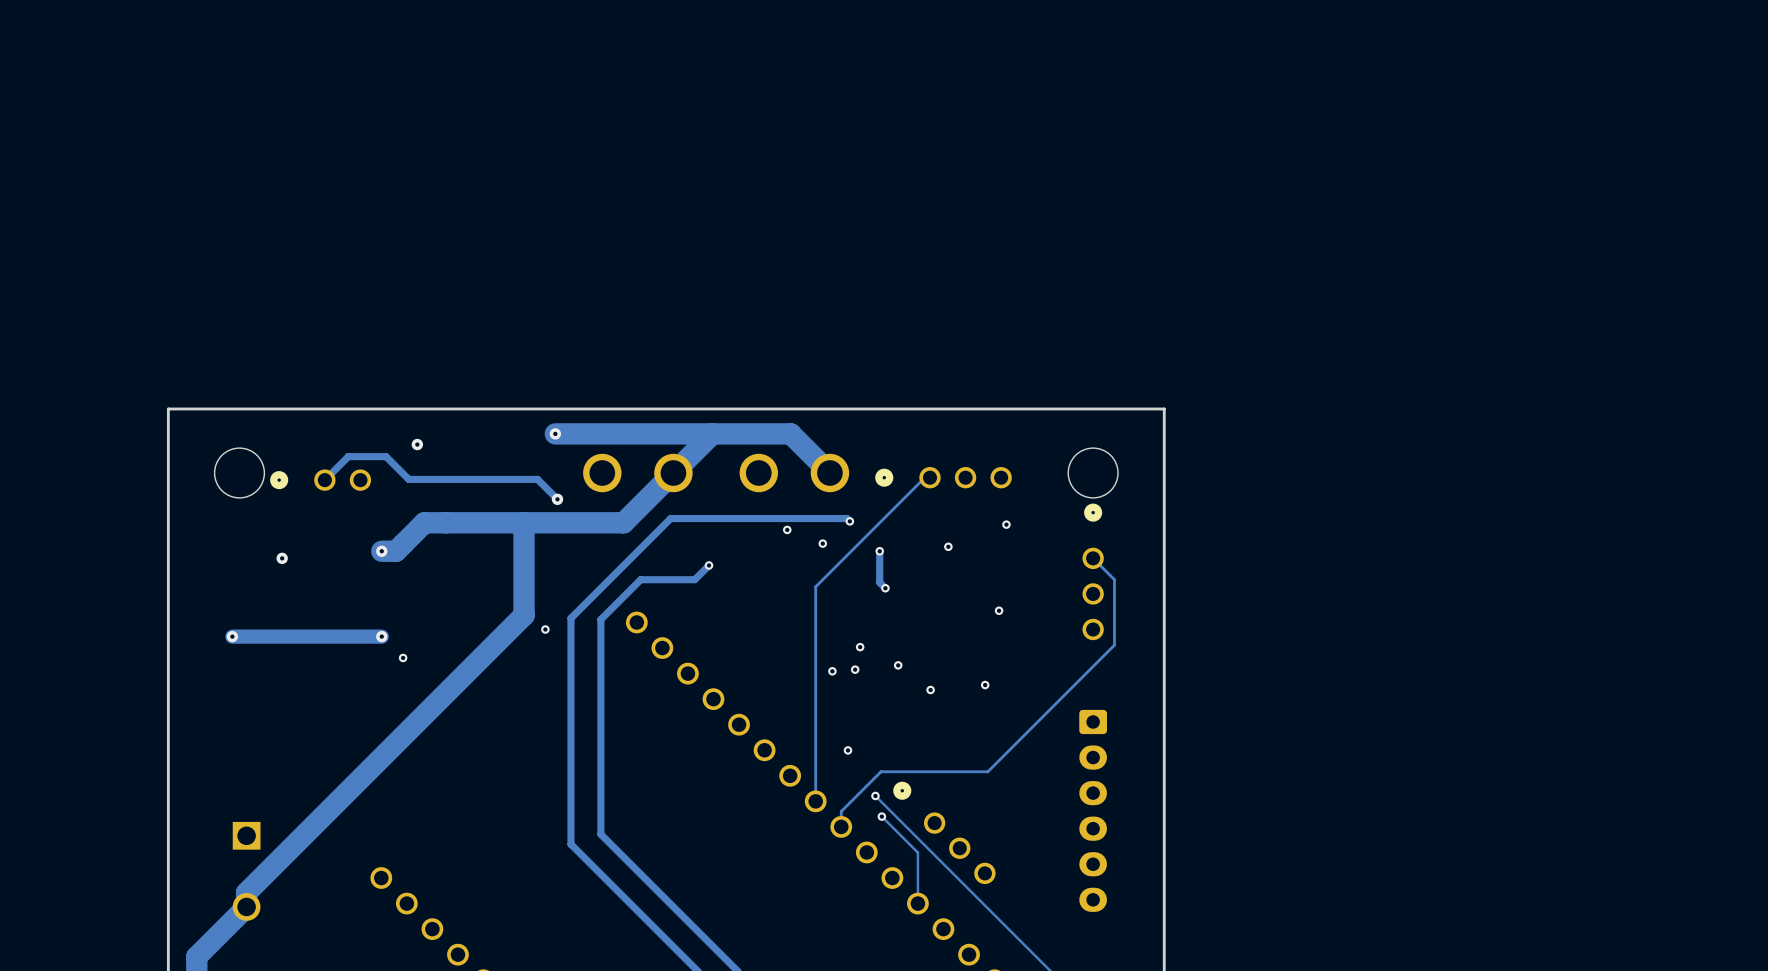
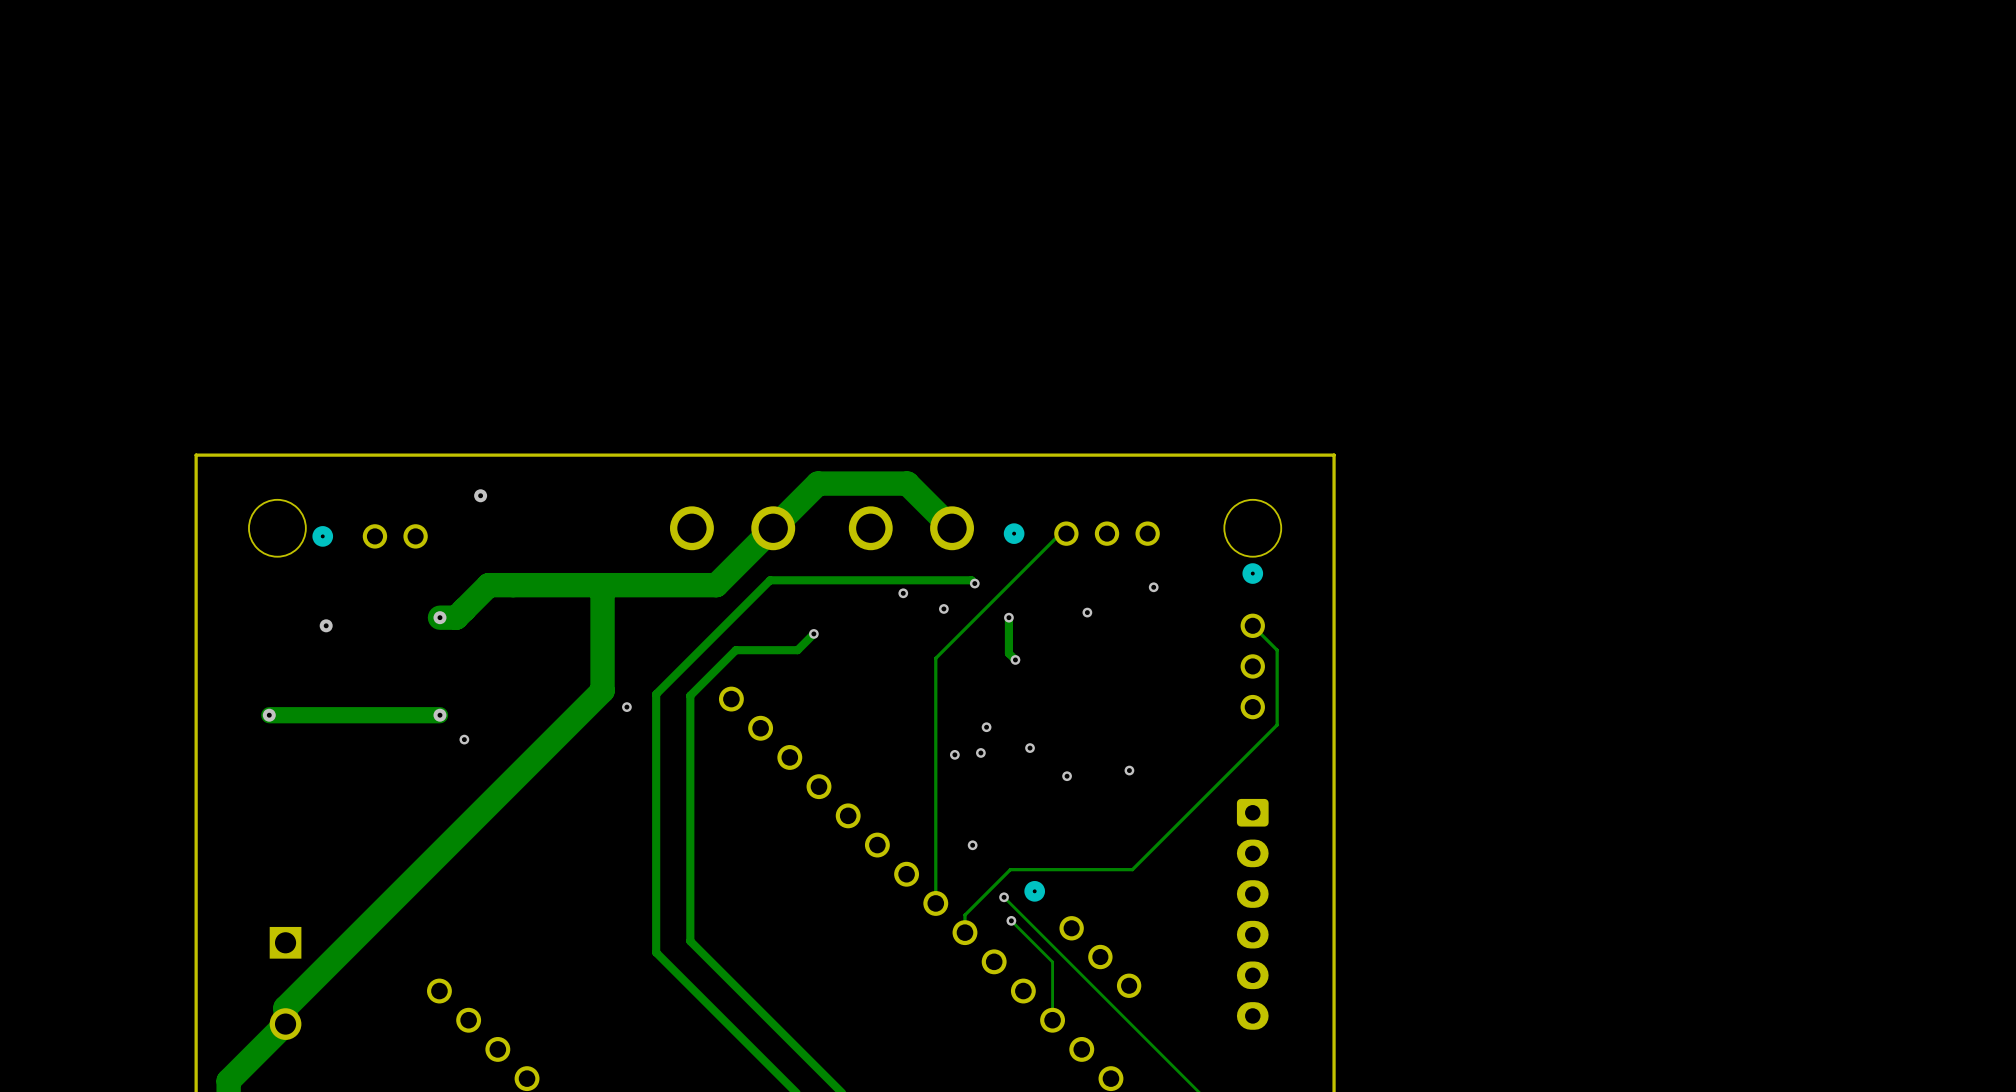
via: (555, 433) -> none
track: (712, 433) (555, 433) -> none
track: (324, 480) (348, 456) (386, 456) (408, 479) (537, 479) (557, 499) -> none
via: (557, 499) -> none
via: (999, 610) -> none

